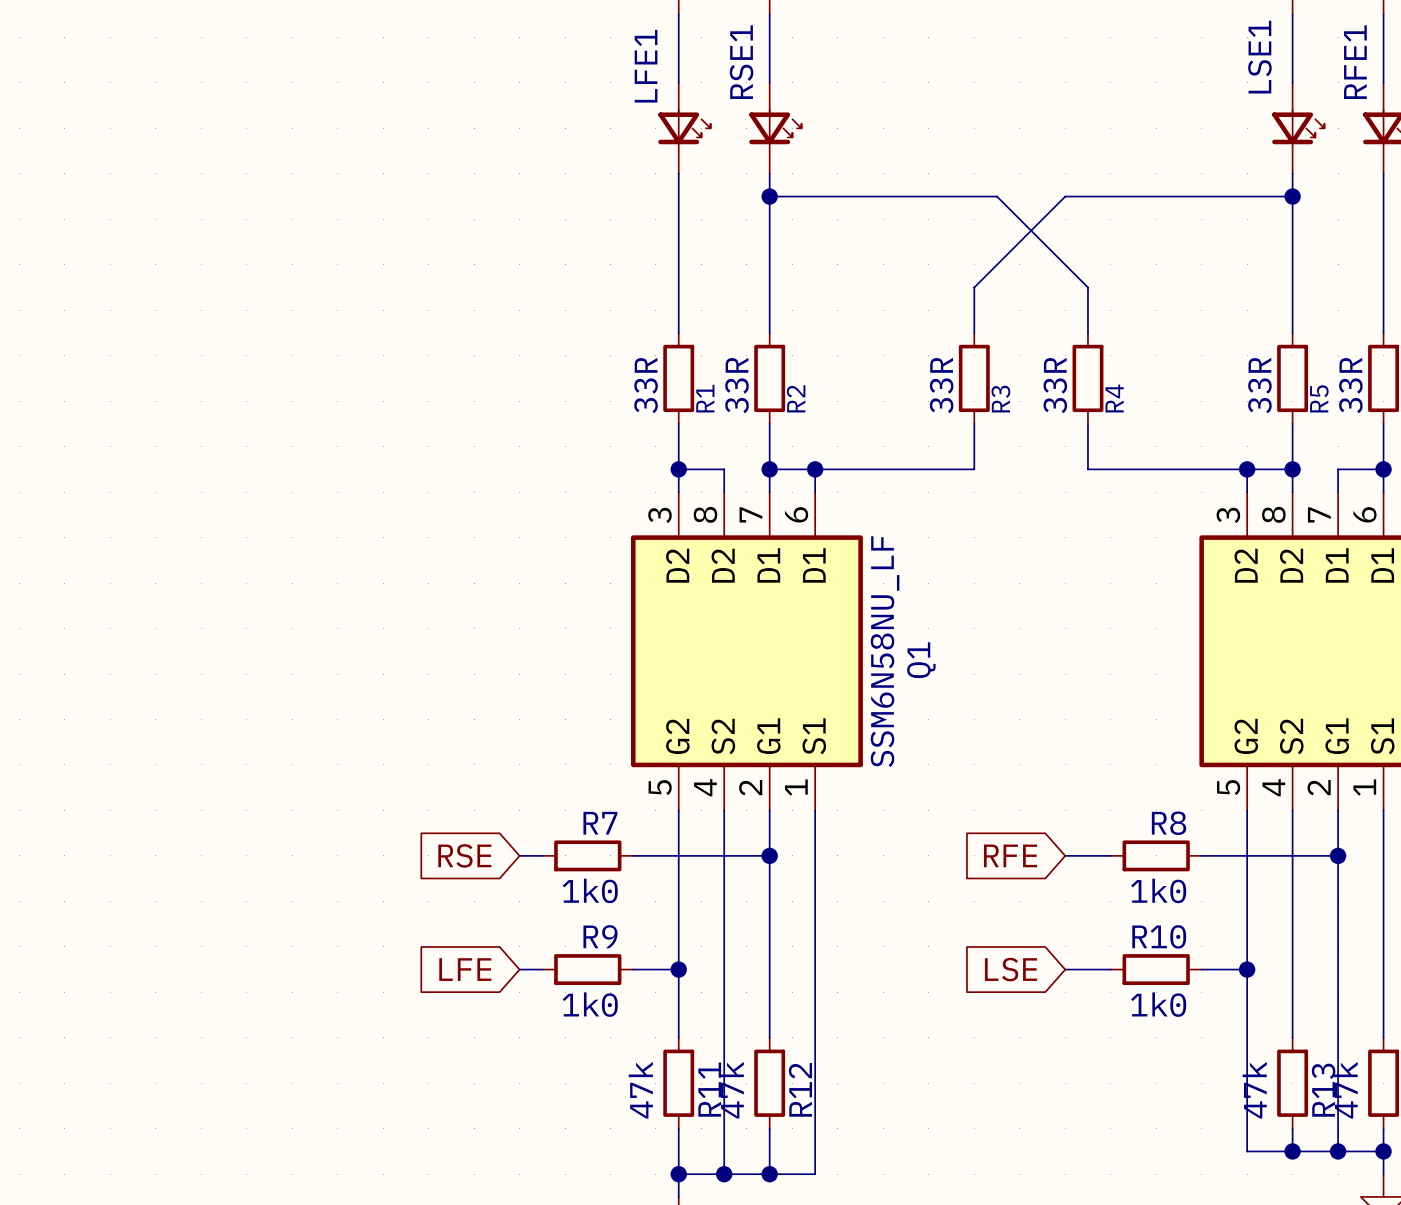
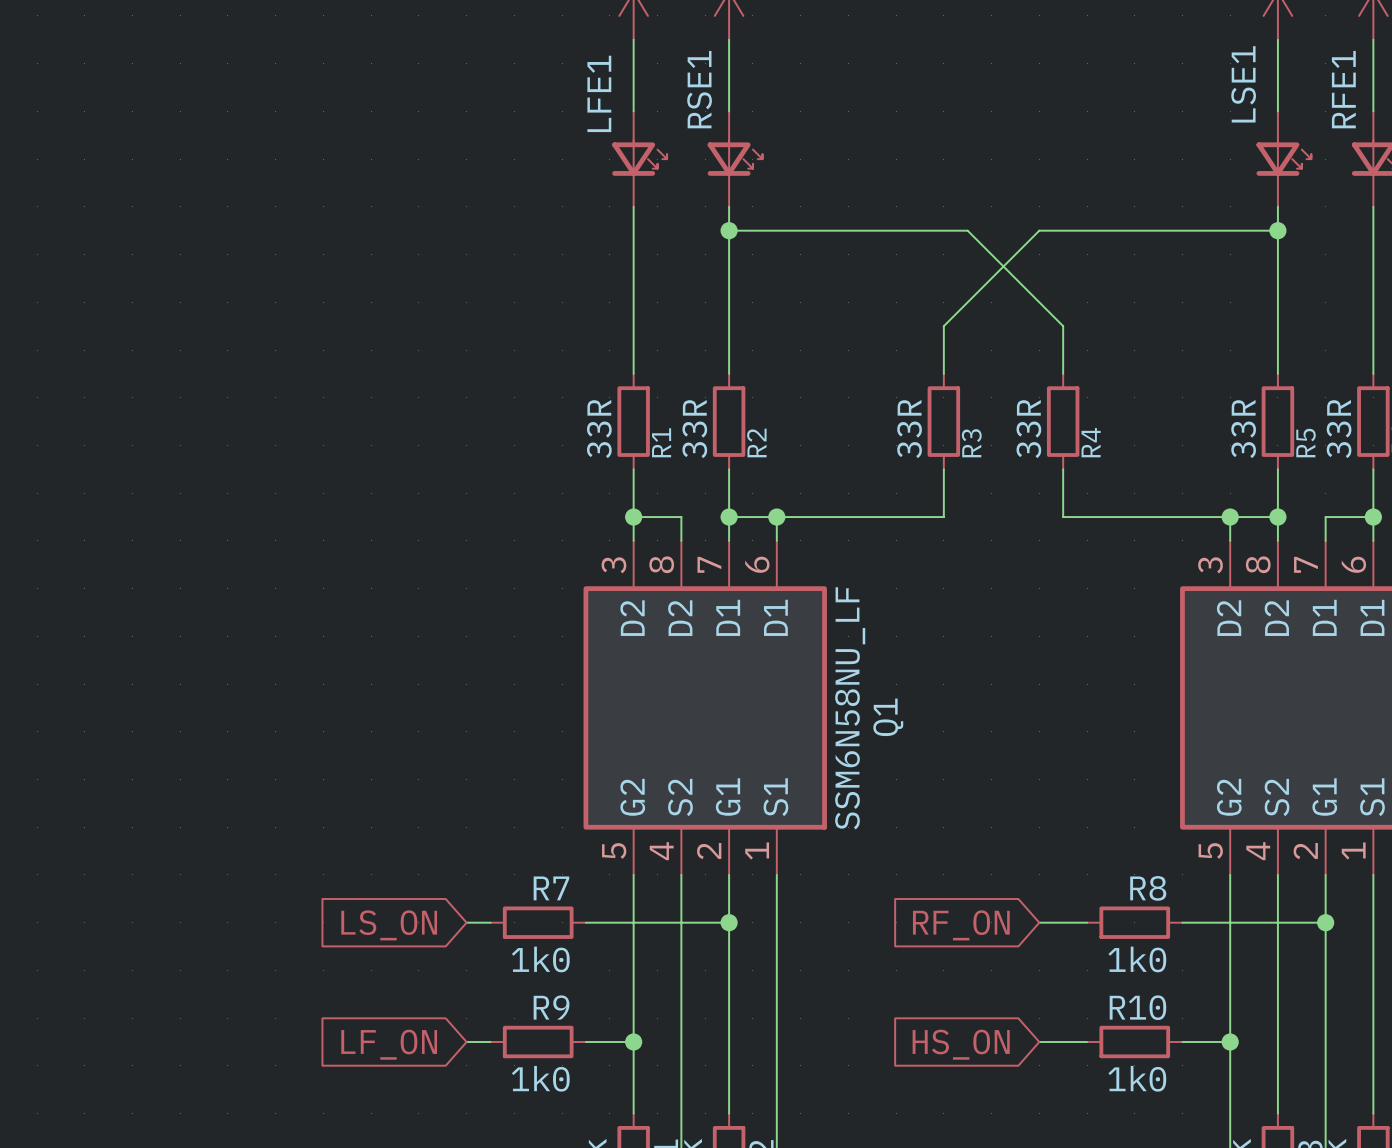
global label: RSE (464, 855) -> LS_ON (389, 925)
global label: RFE (1010, 855) -> RF_ON (961, 925)
global label: LFE (465, 969) -> LF_ON (389, 1044)
global label: LSE (1011, 969) -> HS_ON (961, 1044)

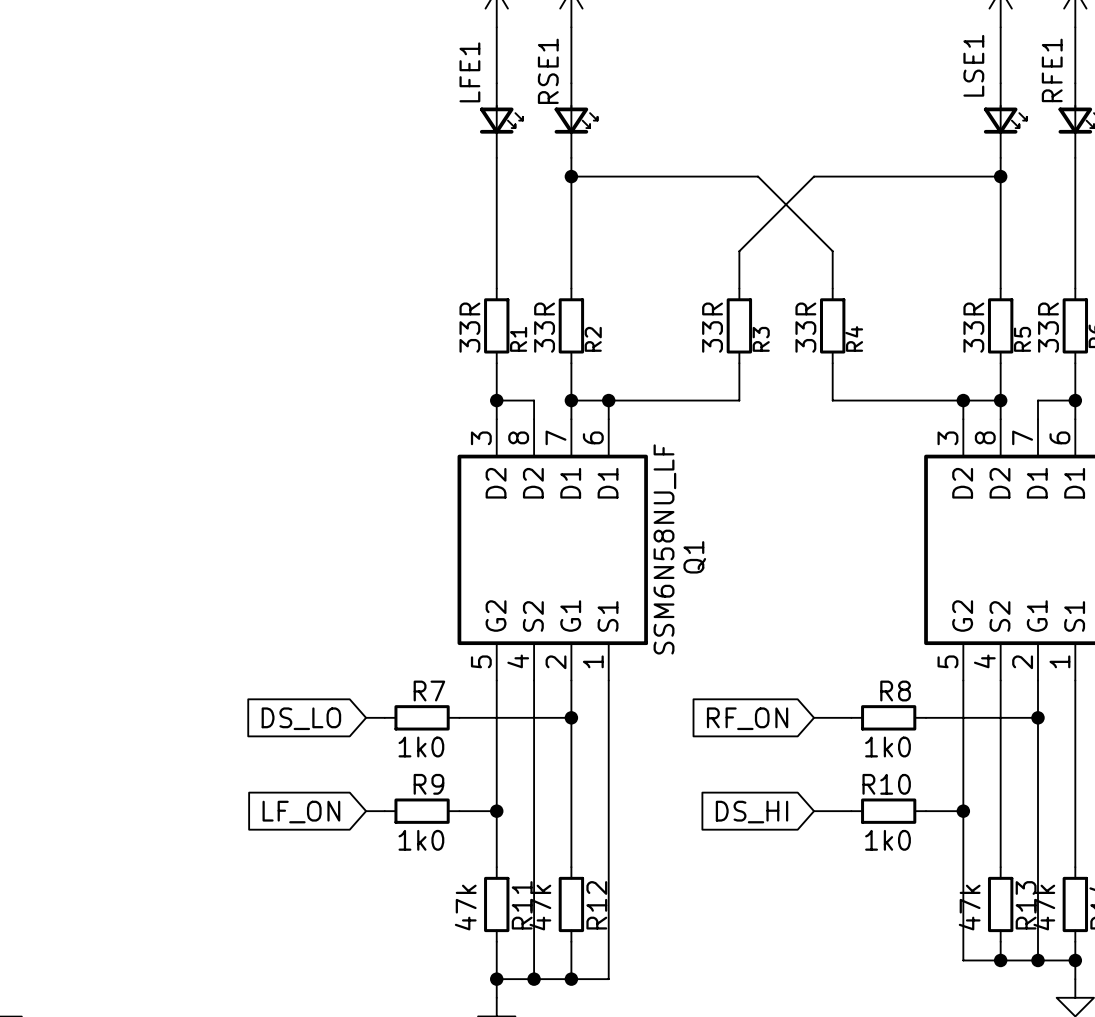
global label: LS_ON (389, 925) -> DS_LO (301, 718)
global label: HS_ON (961, 1044) -> DS_HI (752, 812)

